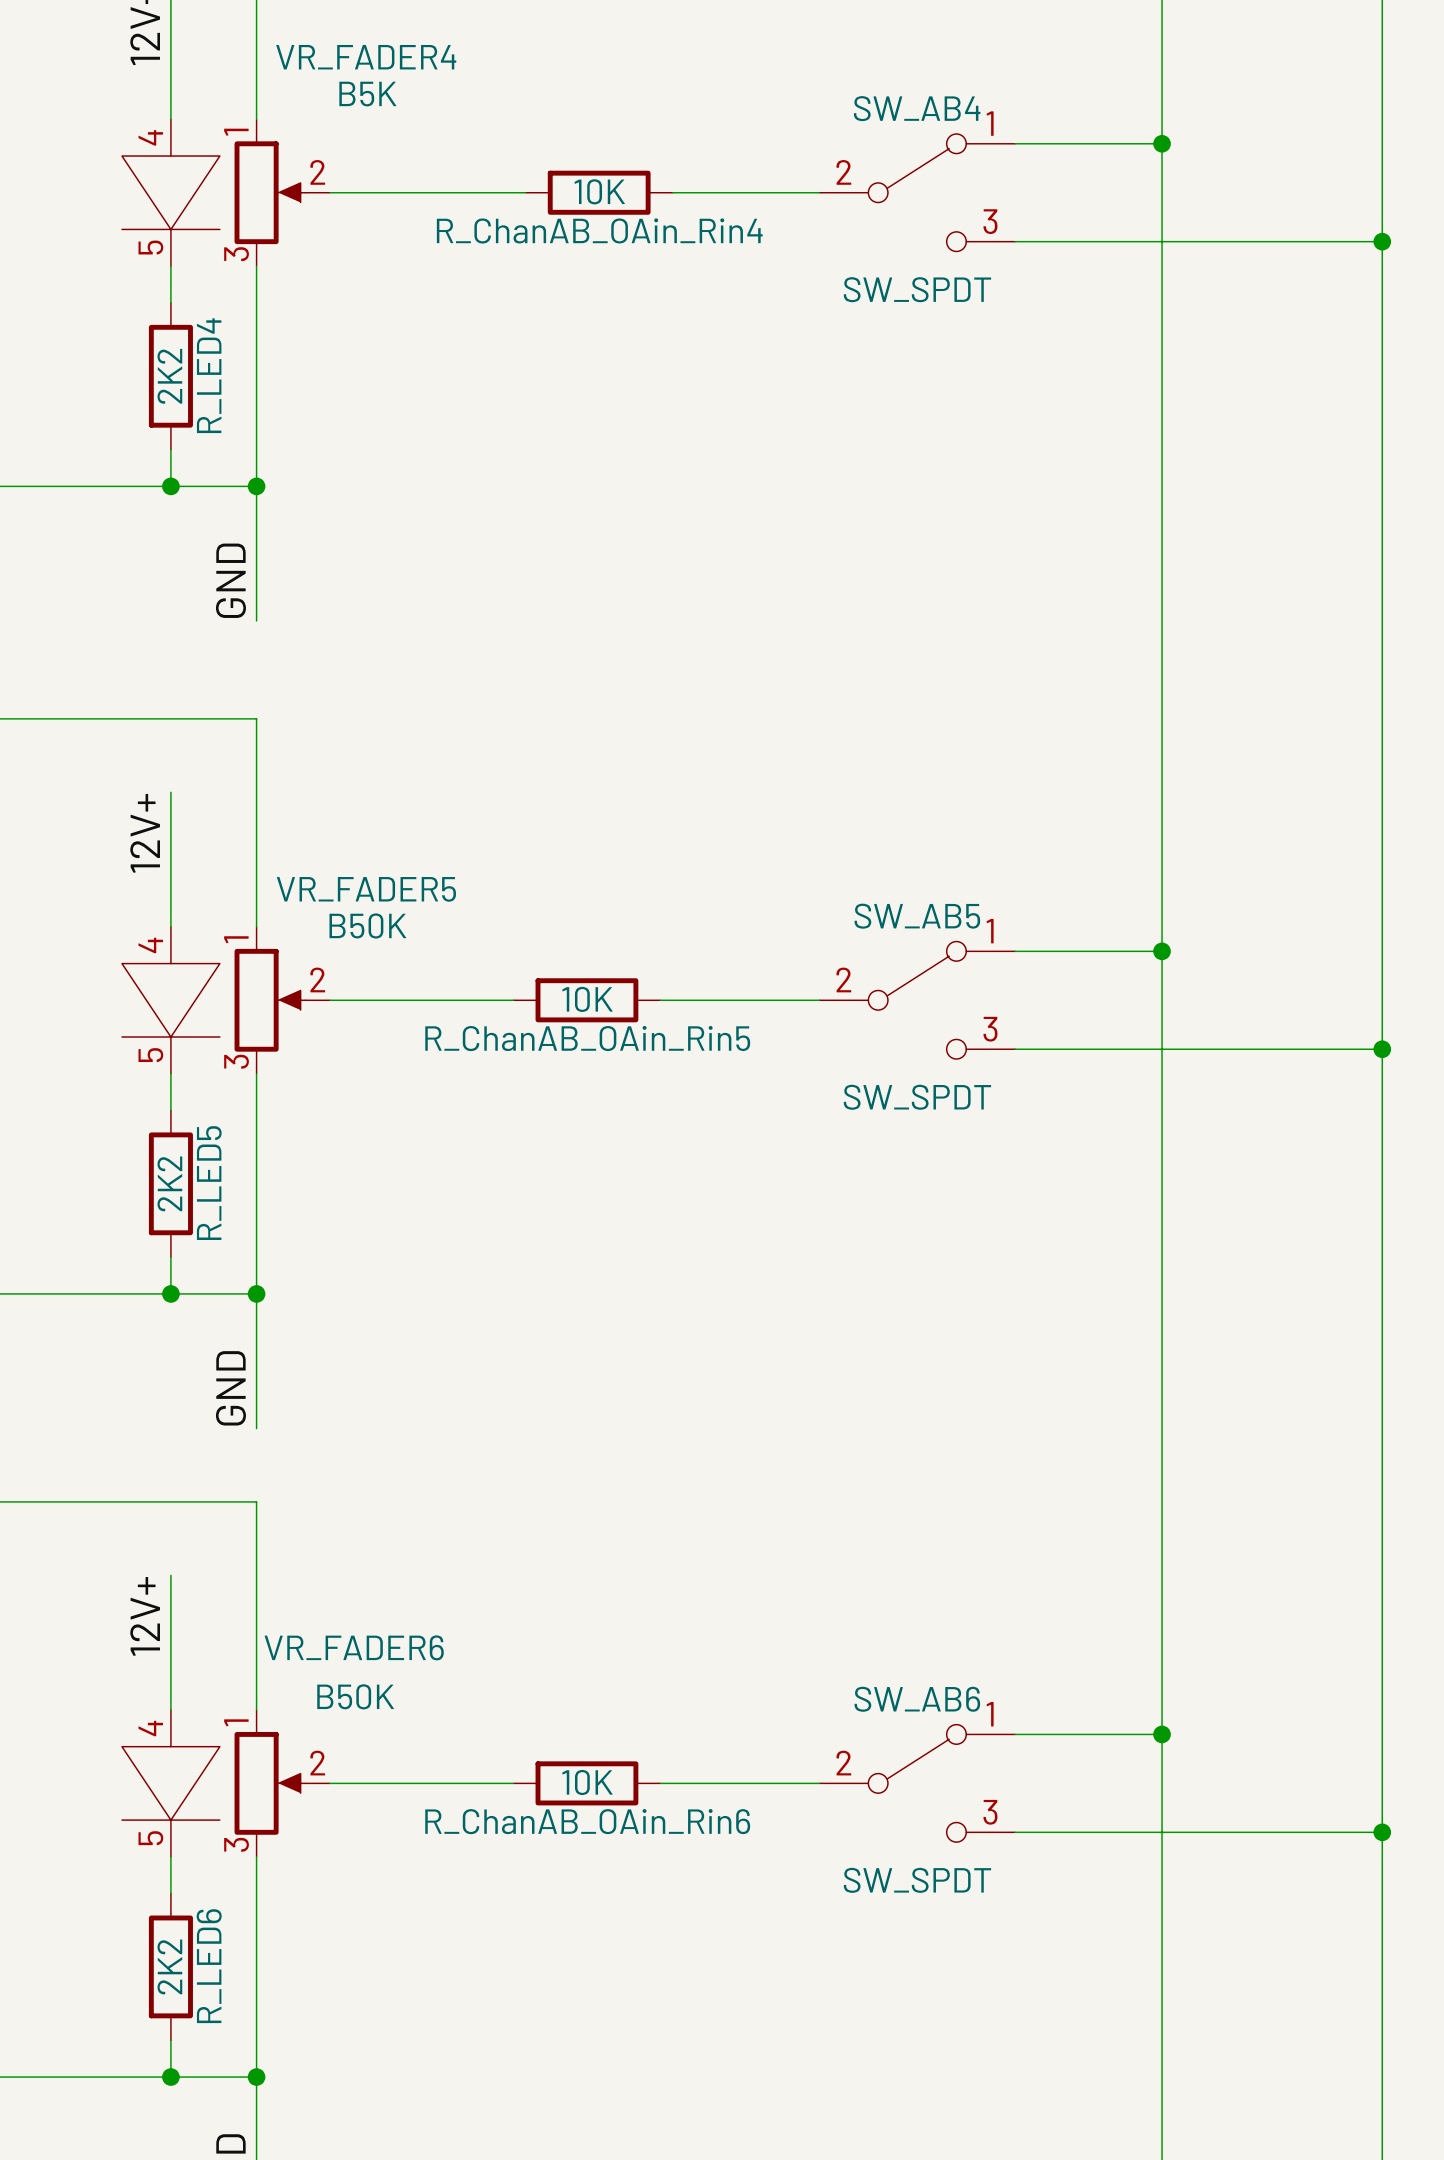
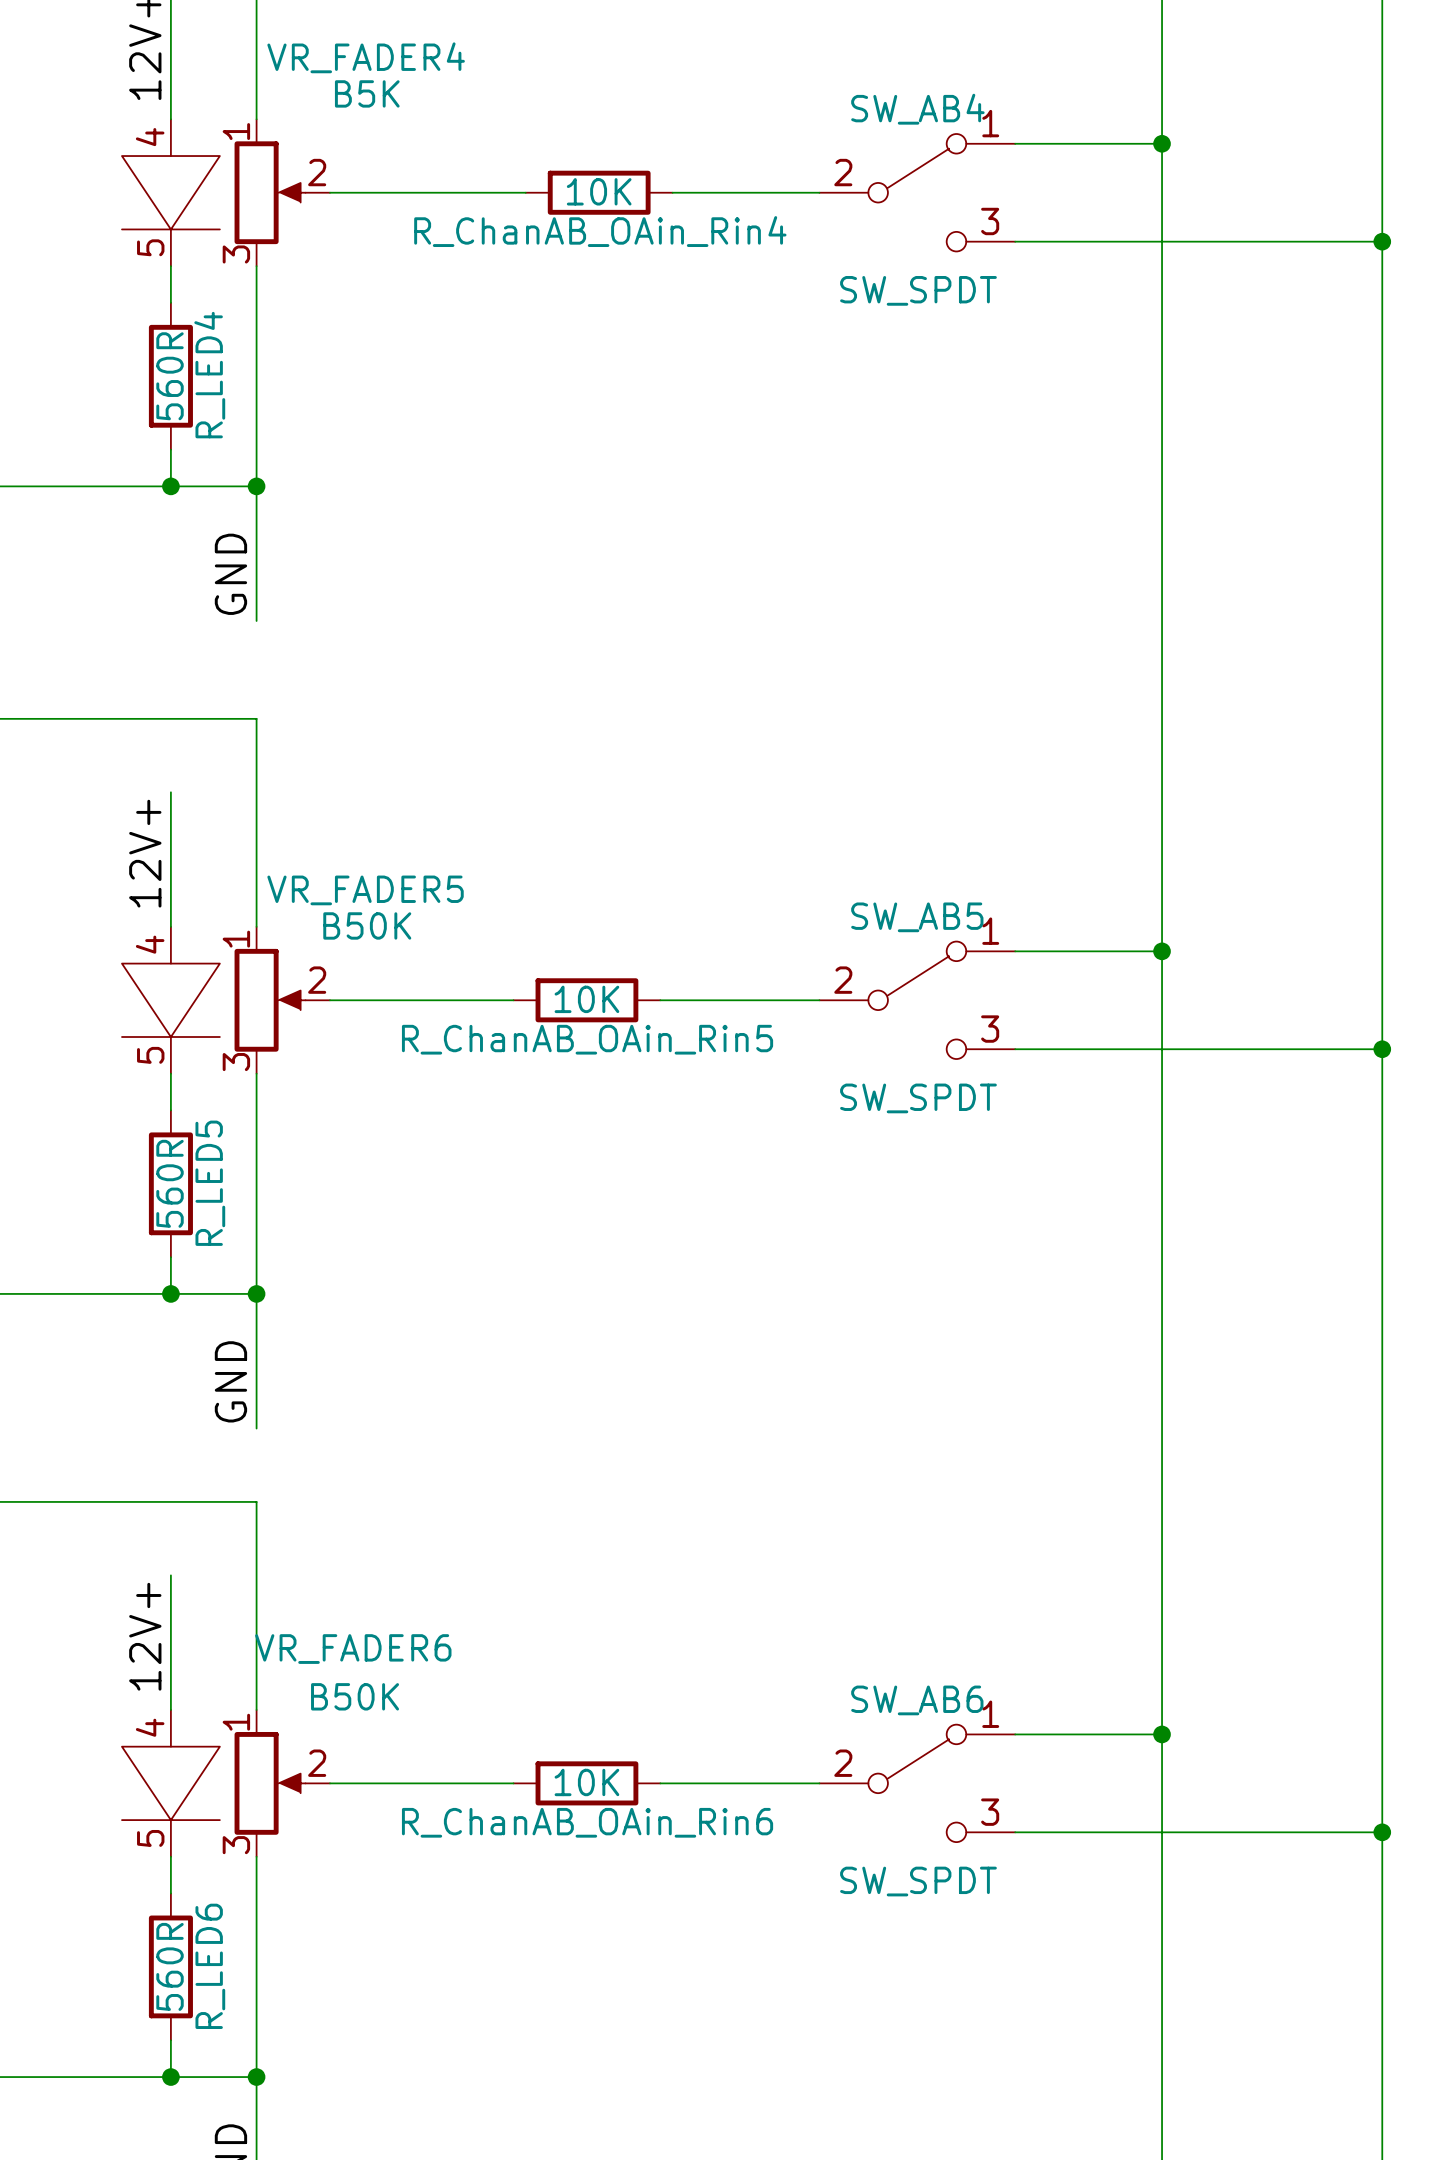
R_LED4 value: 2K2 (169, 376) -> 560R (170, 376)
R_LED5 value: 2K2 (169, 1183) -> 560R (170, 1183)
R_LED6 value: 2K2 (169, 1966) -> 560R (170, 1966)

